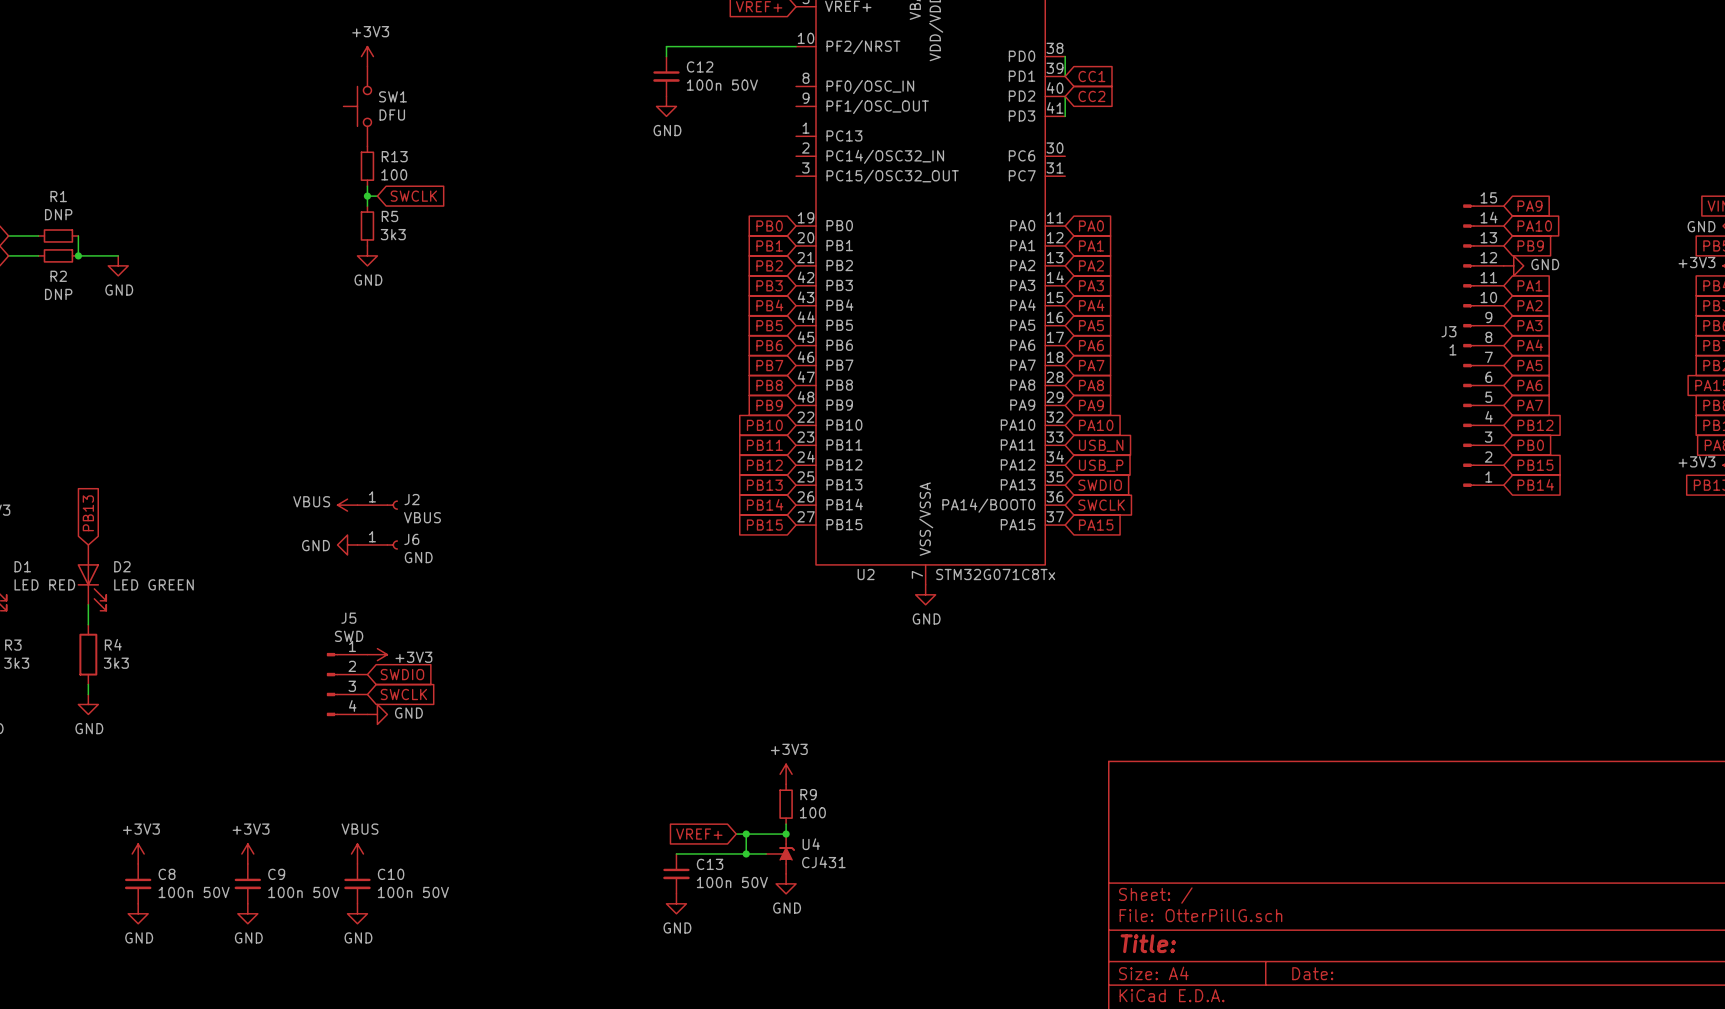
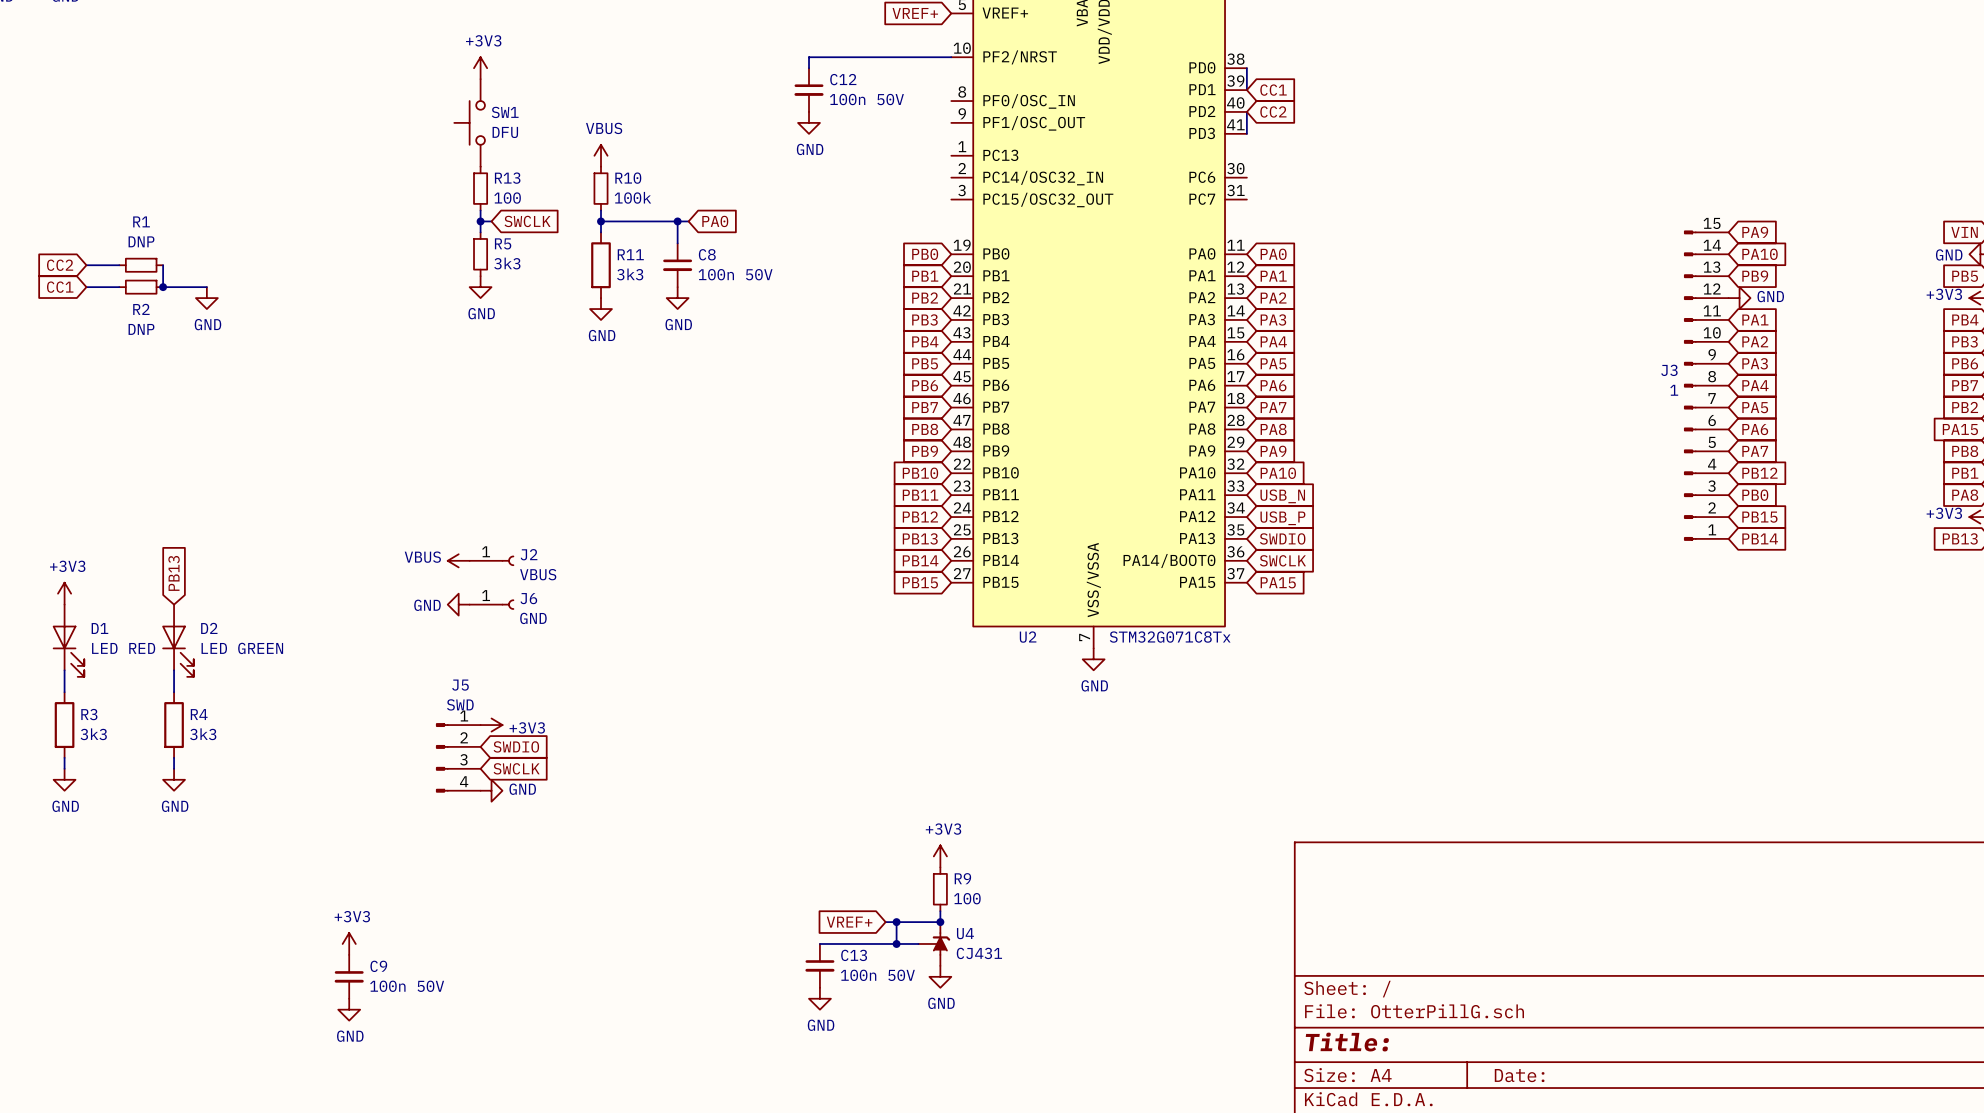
power symbol: none -> VBUS (601, 155)
R10: none -> 100k (601, 188)
wire: none -> (601, 210) (601, 232)
wire: none -> (601, 221) (688, 221)
junction: none -> (601, 221)
wire: none -> (677, 221) (677, 243)
junction: none -> (677, 221)
global label: none -> PA0 (715, 221)
R11: none -> 3k3 (601, 265)
power symbol: none -> GND (677, 298)
power symbol: none -> GND (601, 309)
power symbol: +3V3 (138, 853) -> none
power symbol: VBUS (357, 853) -> none
C8 position: (138, 883) -> (677, 265)
C10: 100n 50V (357, 883) -> none
power symbol: GND (138, 913) -> none
power symbol: GND (357, 913) -> none

